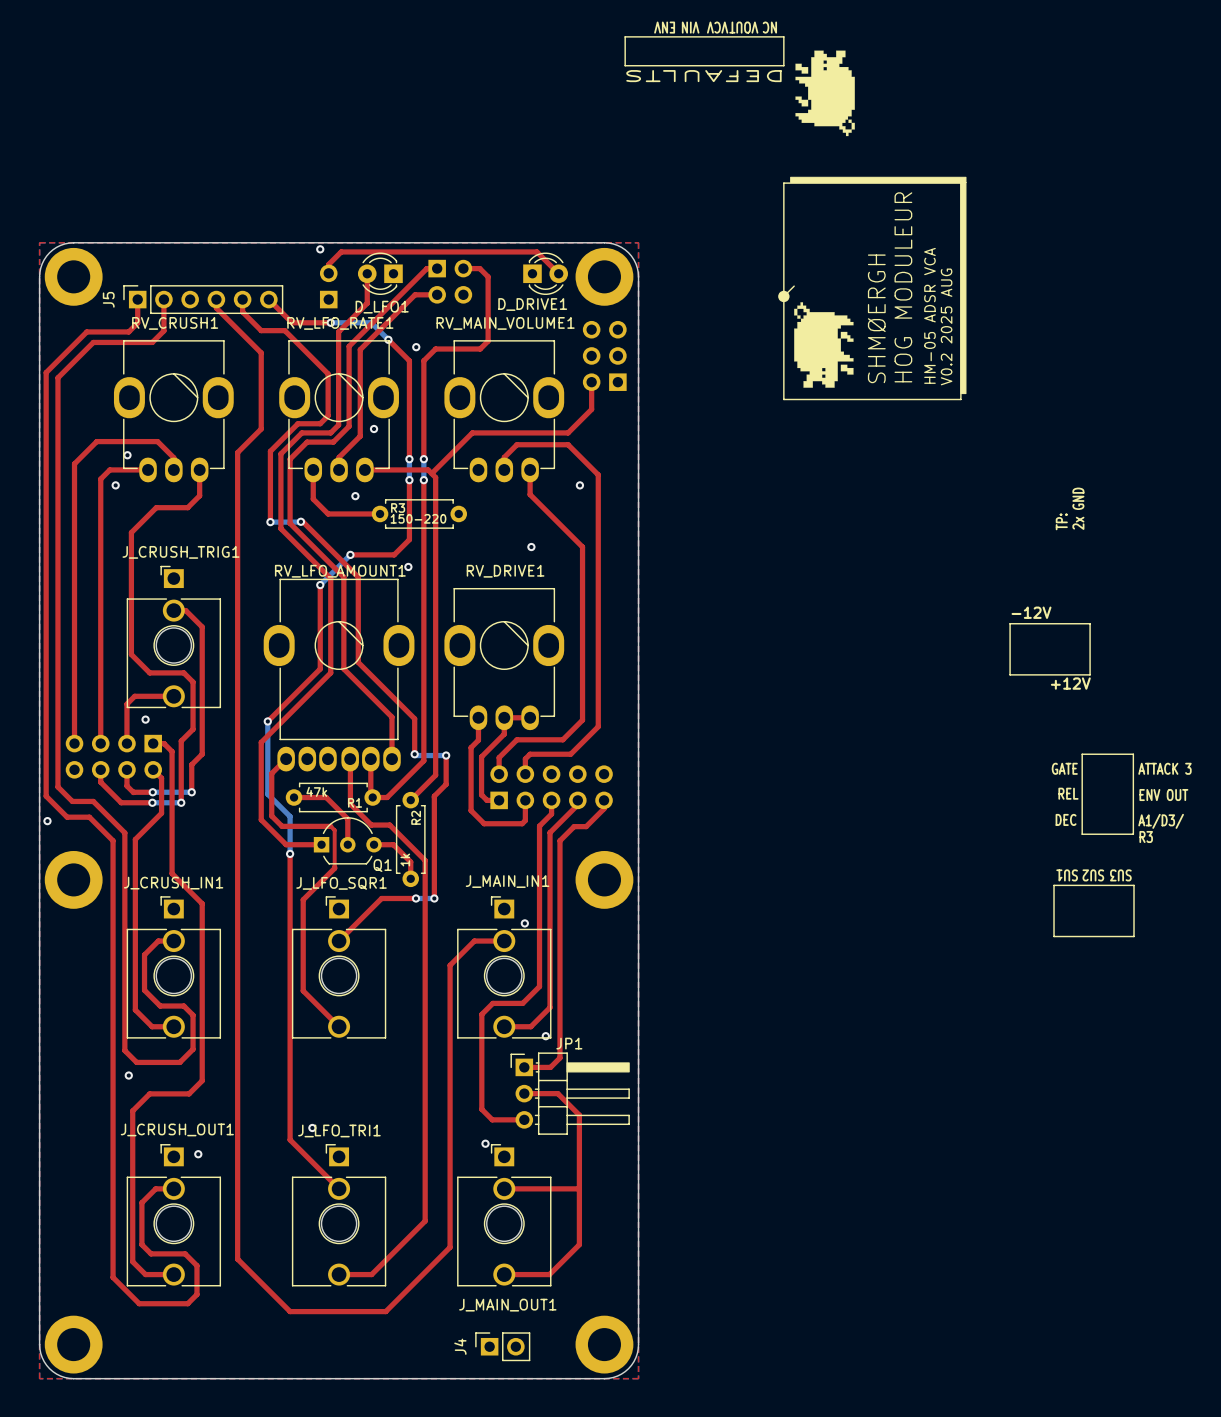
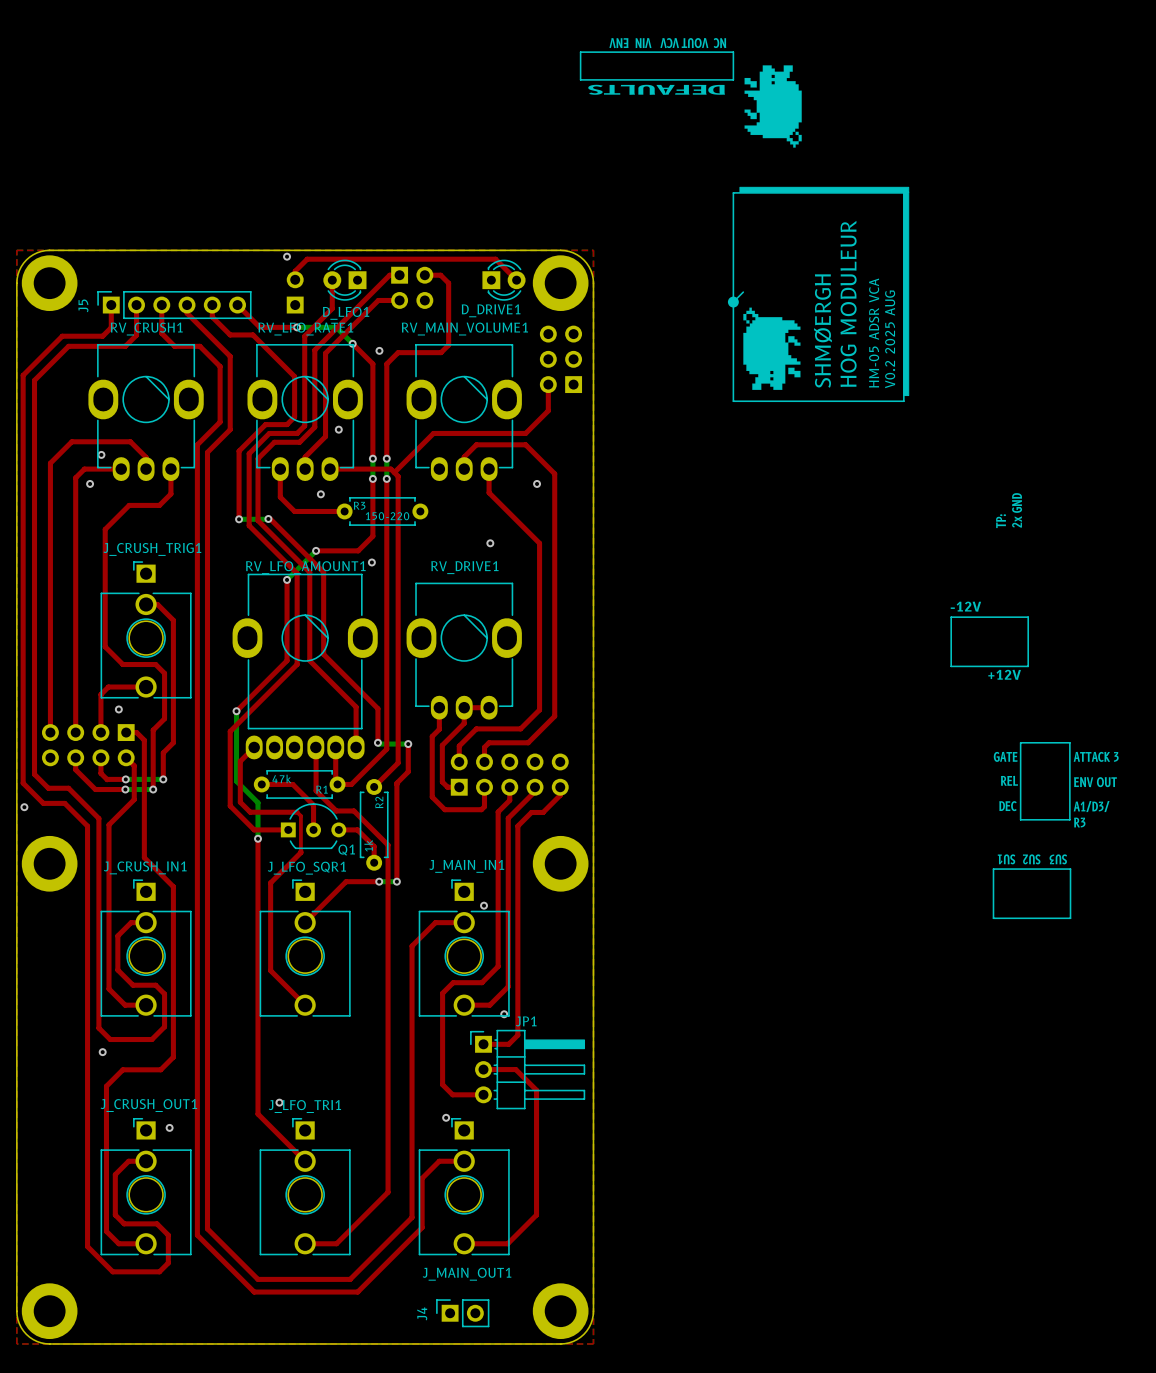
top track: (504, 1188) (579, 1189) -> (464, 1161) (439, 1161) (422, 1178) (422, 1227) (357, 1292) (254, 1292) (197, 1235) (197, 444) (220, 422) (220, 366) (199, 346) (174, 346) (161, 333) (161, 305)

